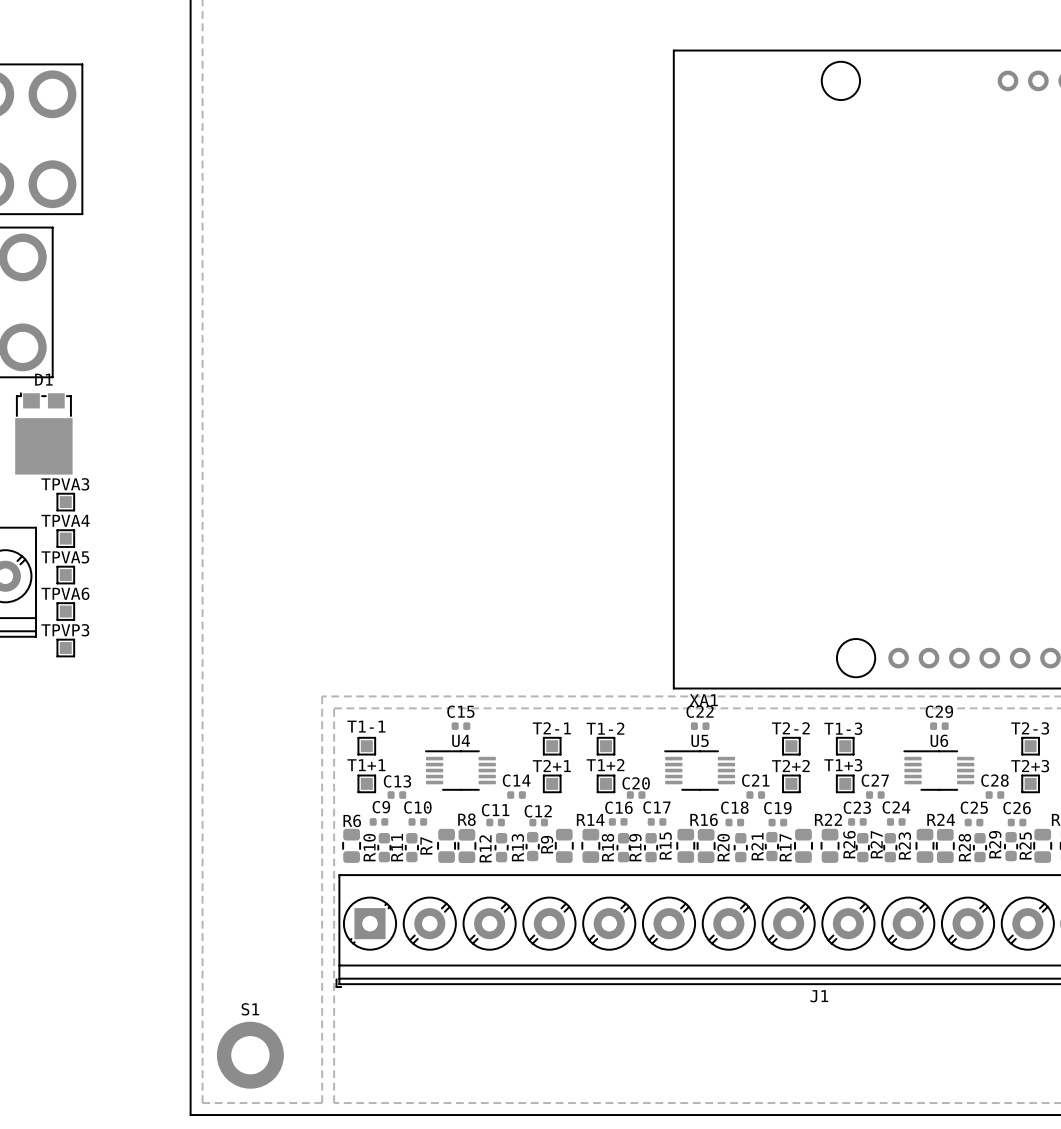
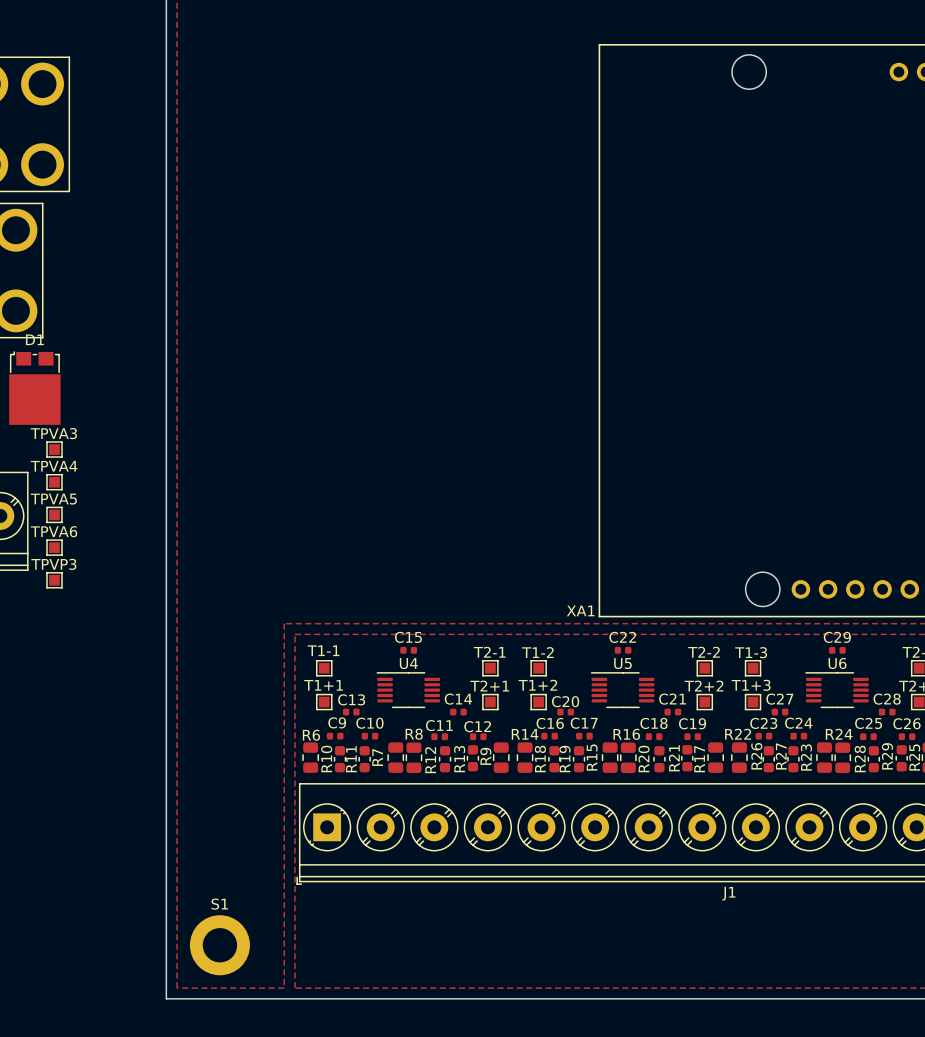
XA1 name position: XA1 (703, 700) -> XA1 (580, 610)

